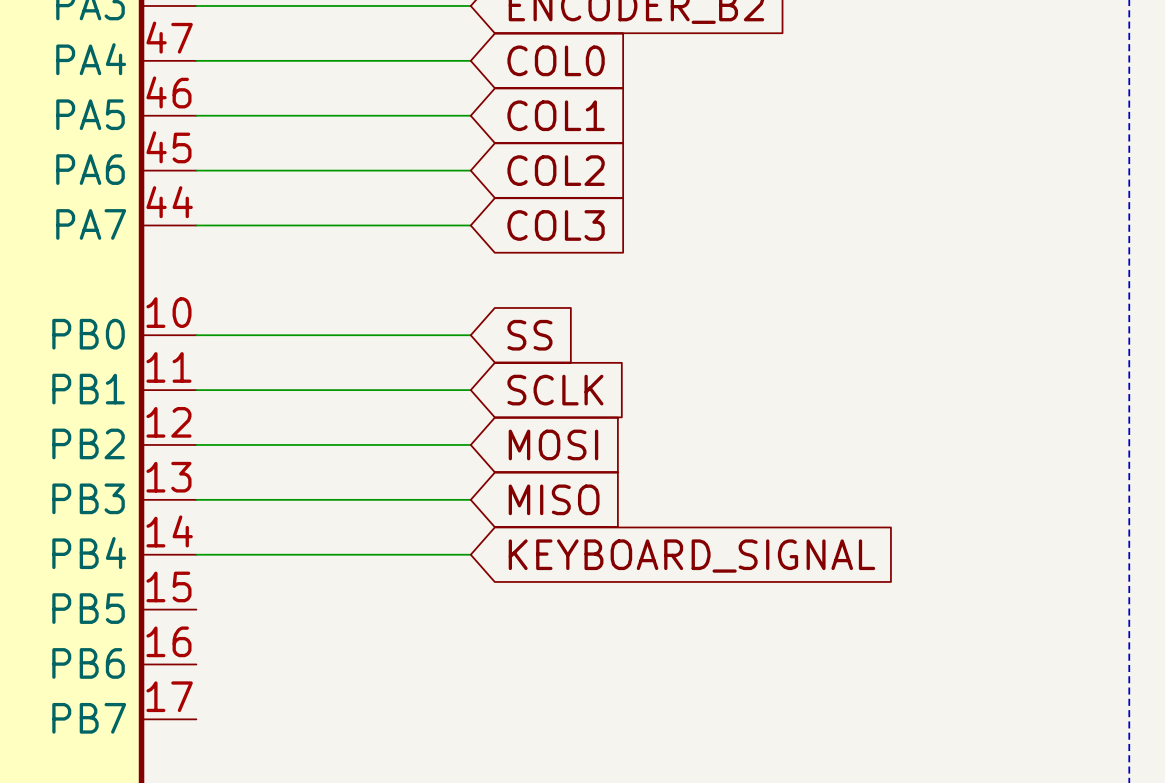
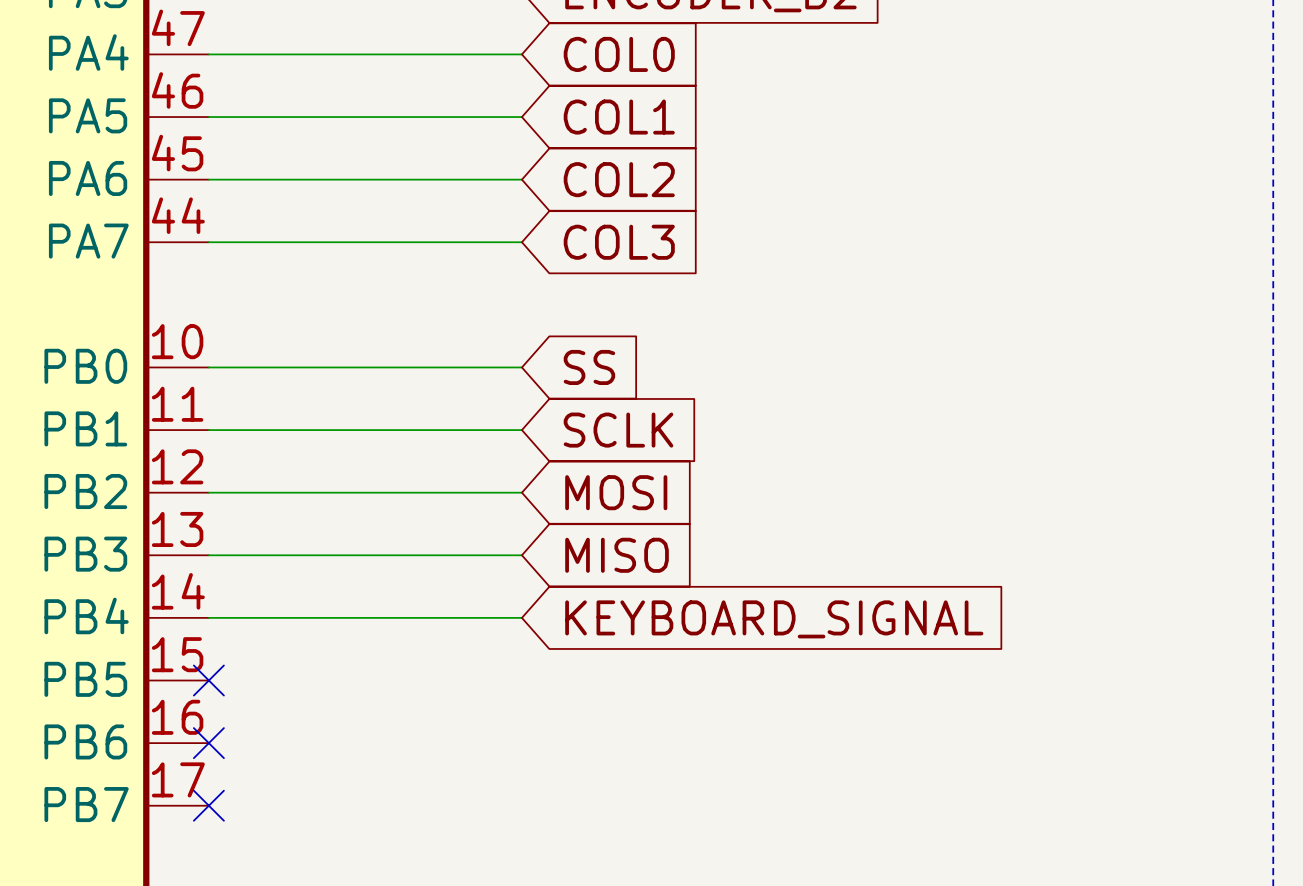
no-connect mark: none -> (208, 680)
no-connect mark: none -> (208, 743)
no-connect mark: none -> (208, 805)

